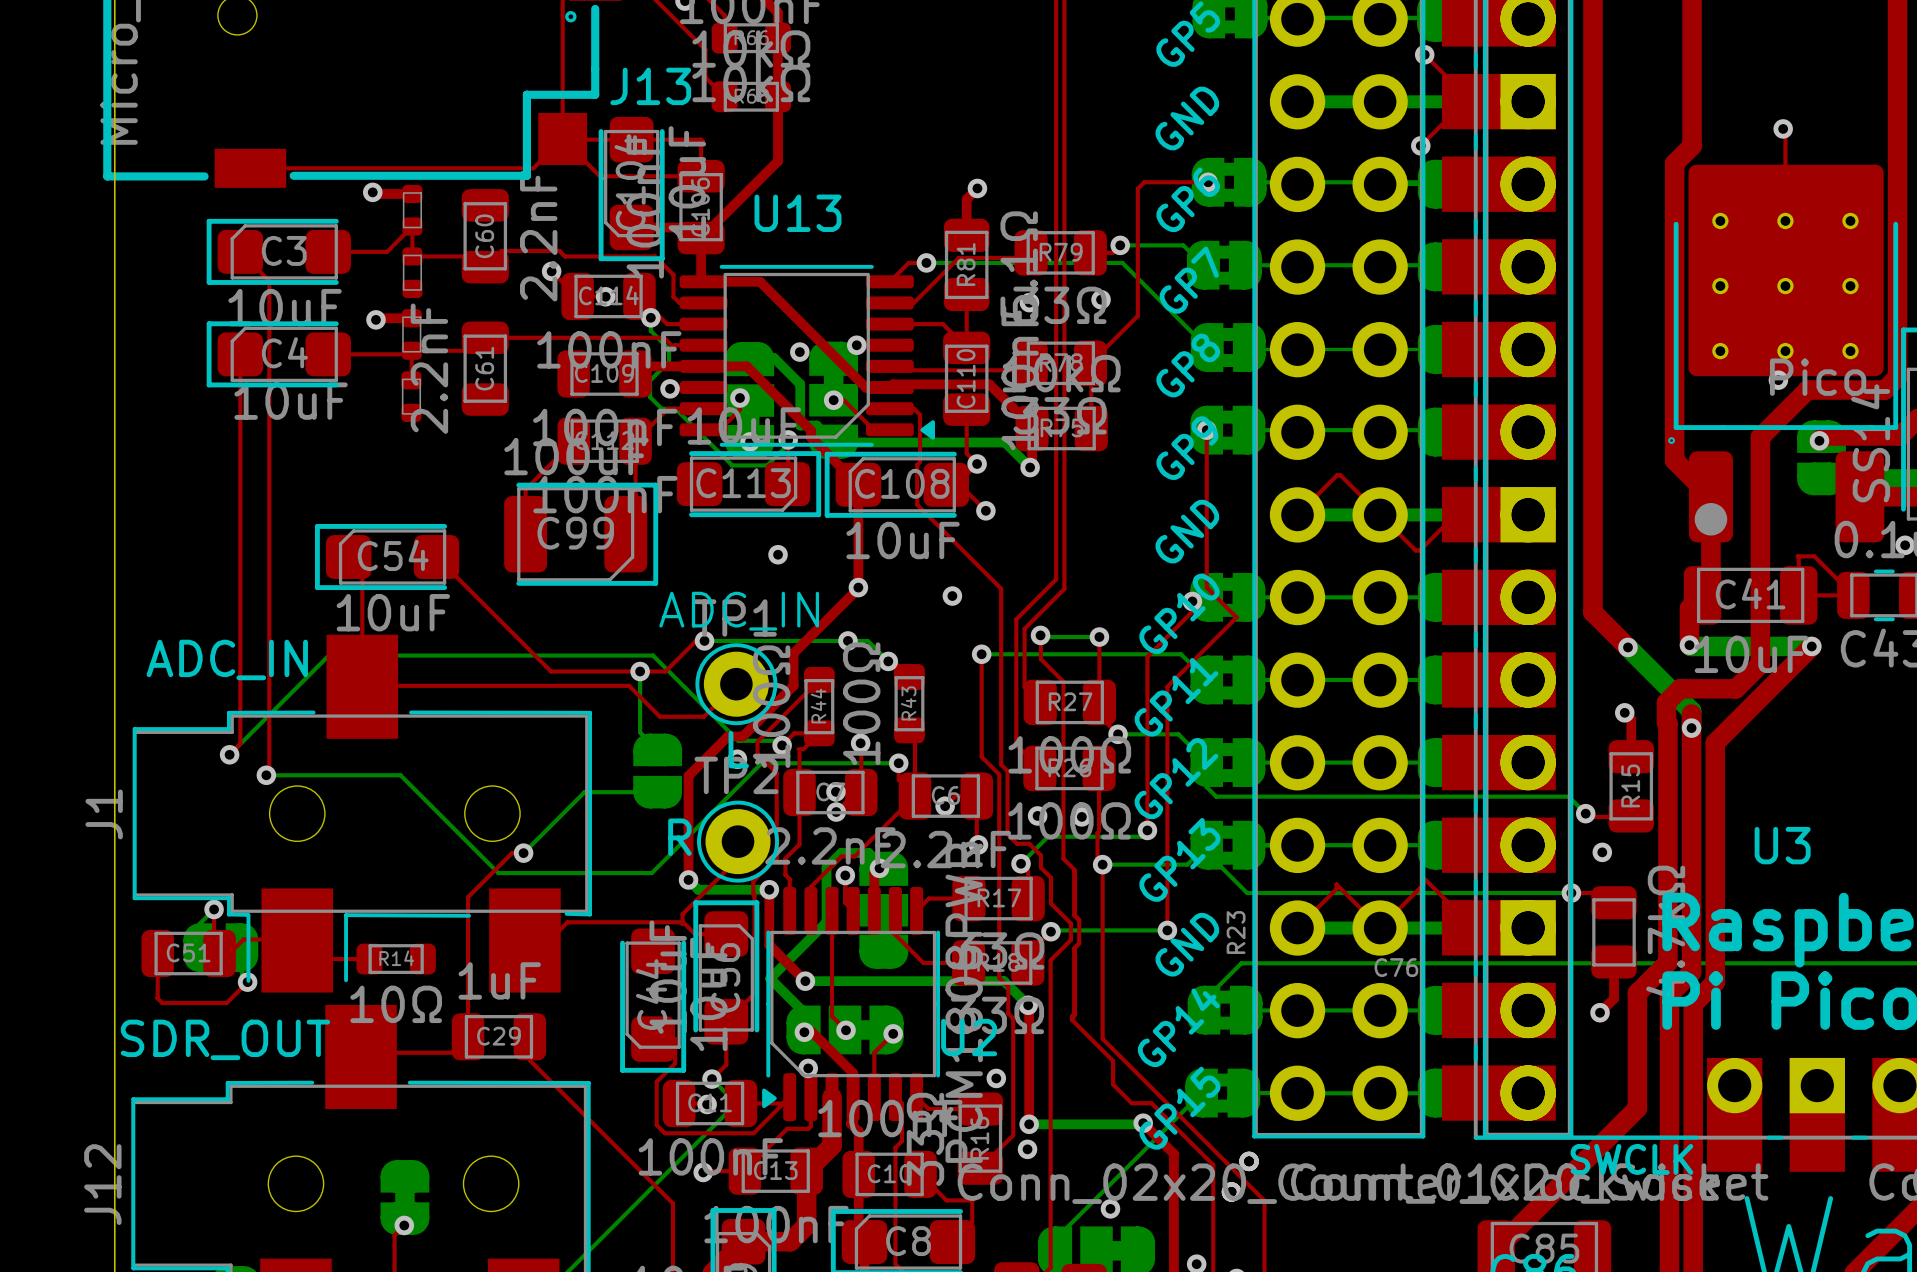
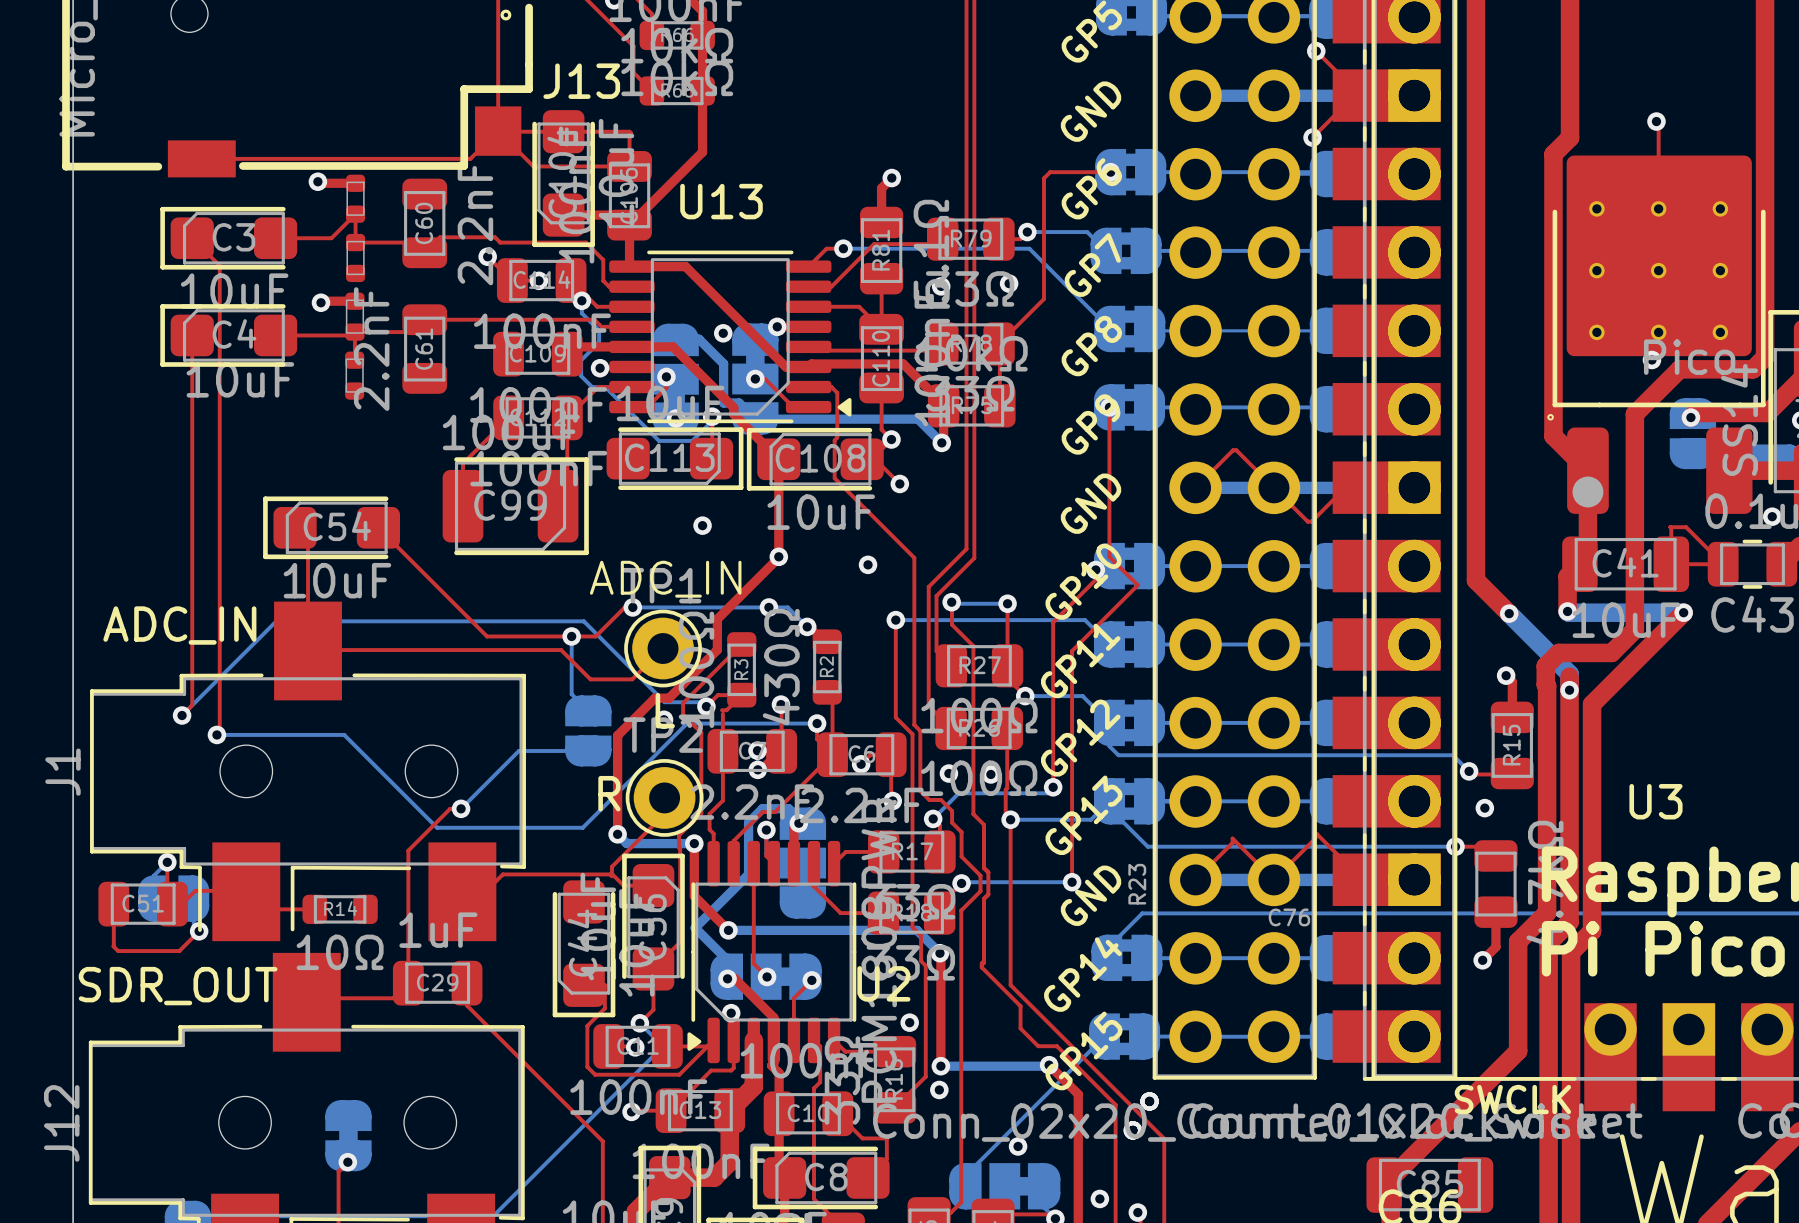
R43 value: 100Ω (861, 703) -> 430Ω (781, 667)
R43 name: R43 (908, 703) -> R2 (826, 666)
R44 name: R44 (818, 706) -> R3 (741, 669)

